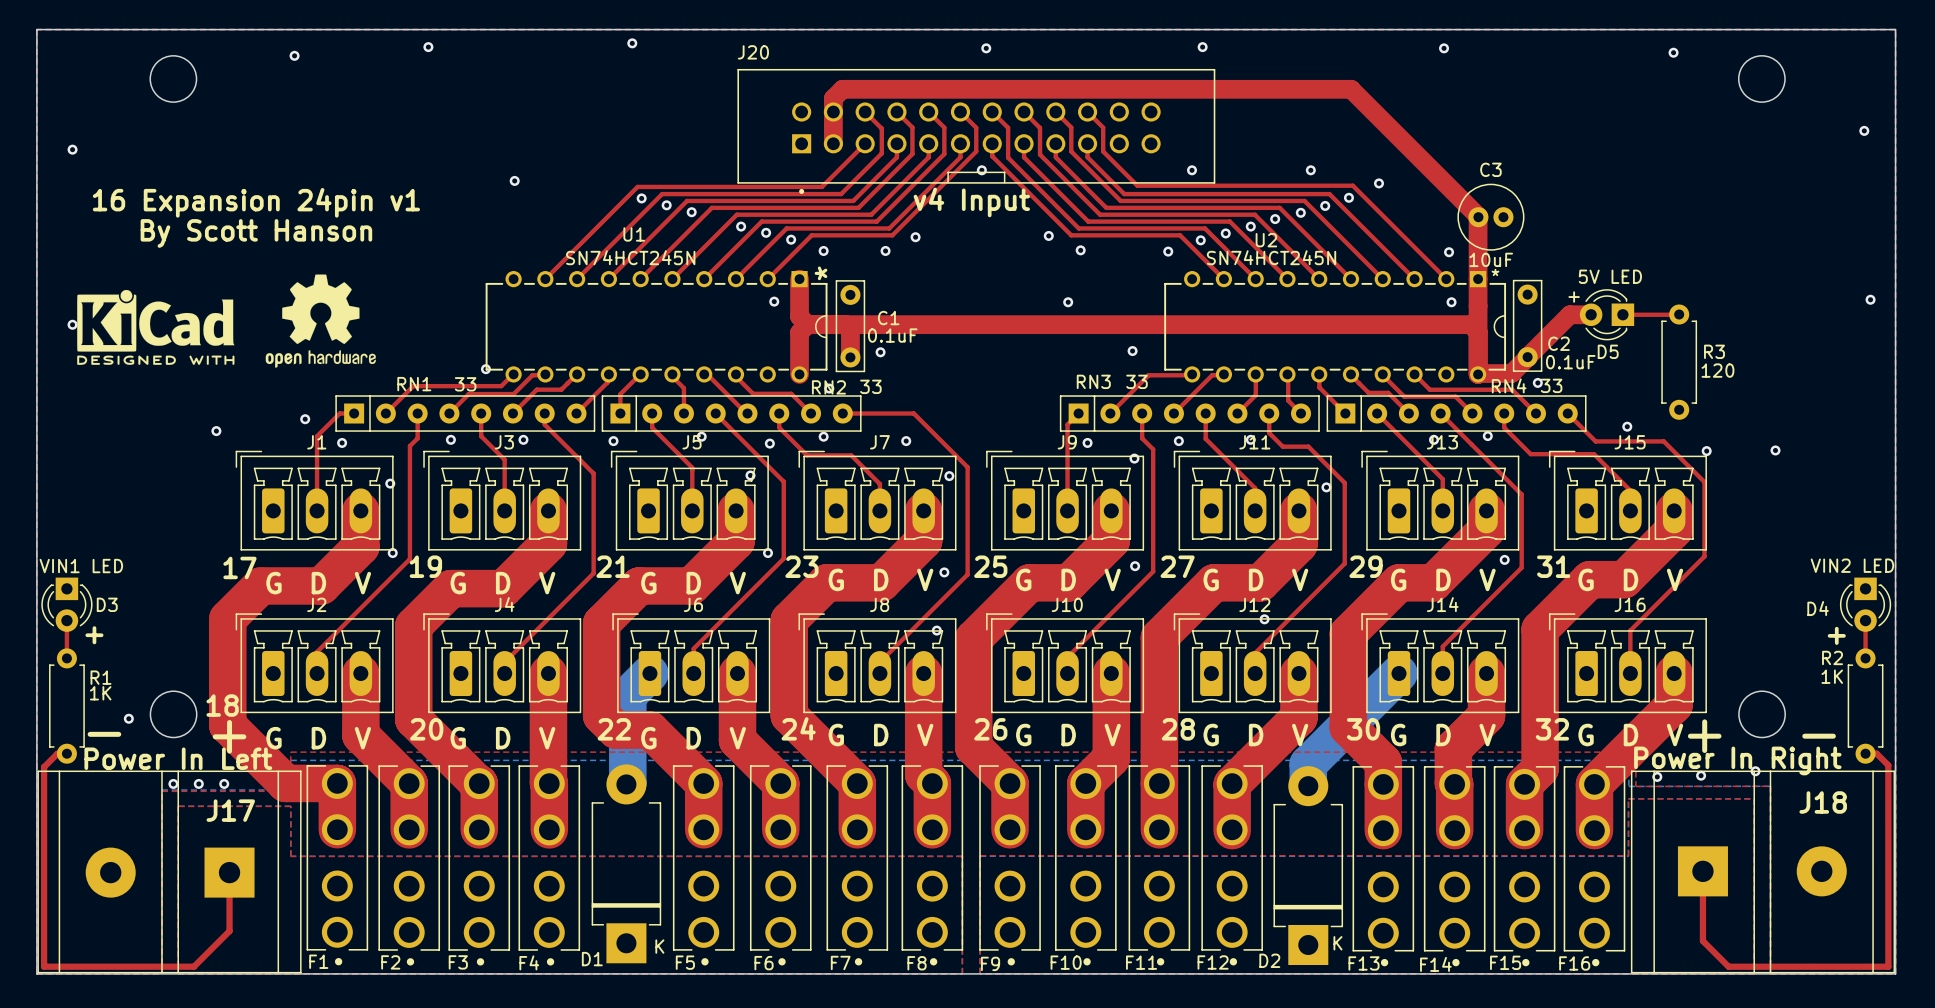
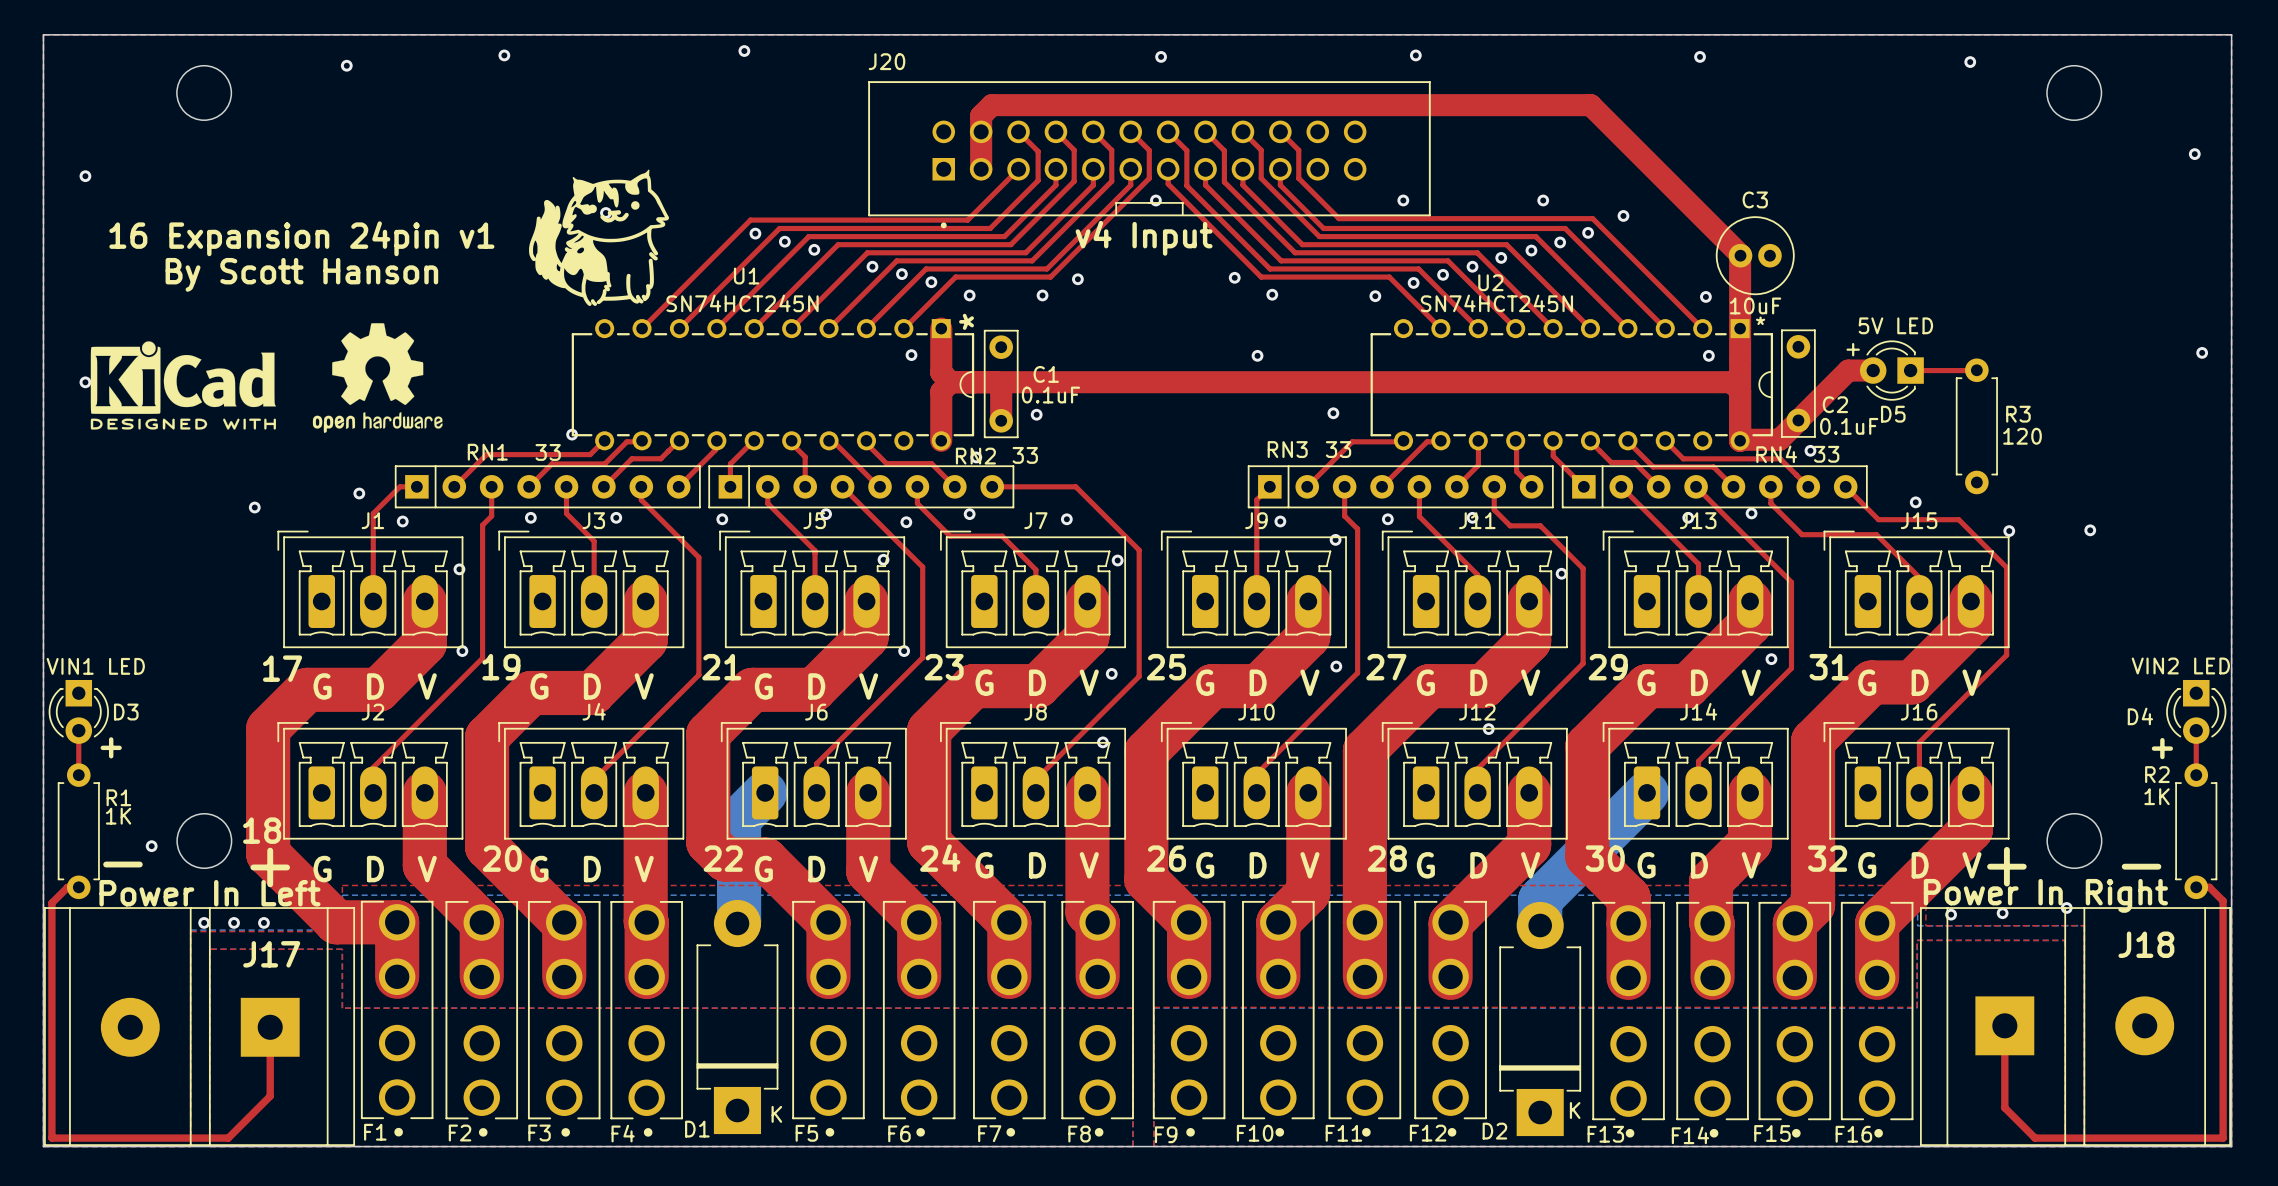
drawing: none -> [529, 169, 669, 306]

